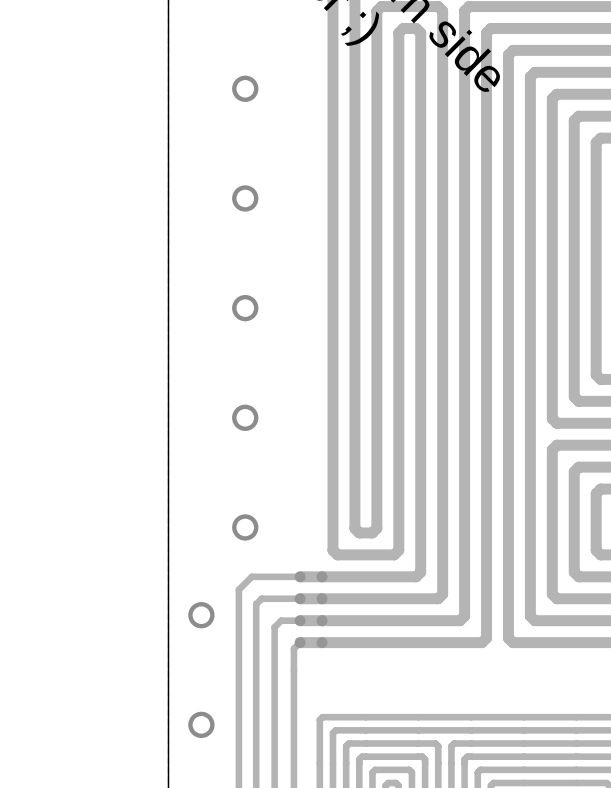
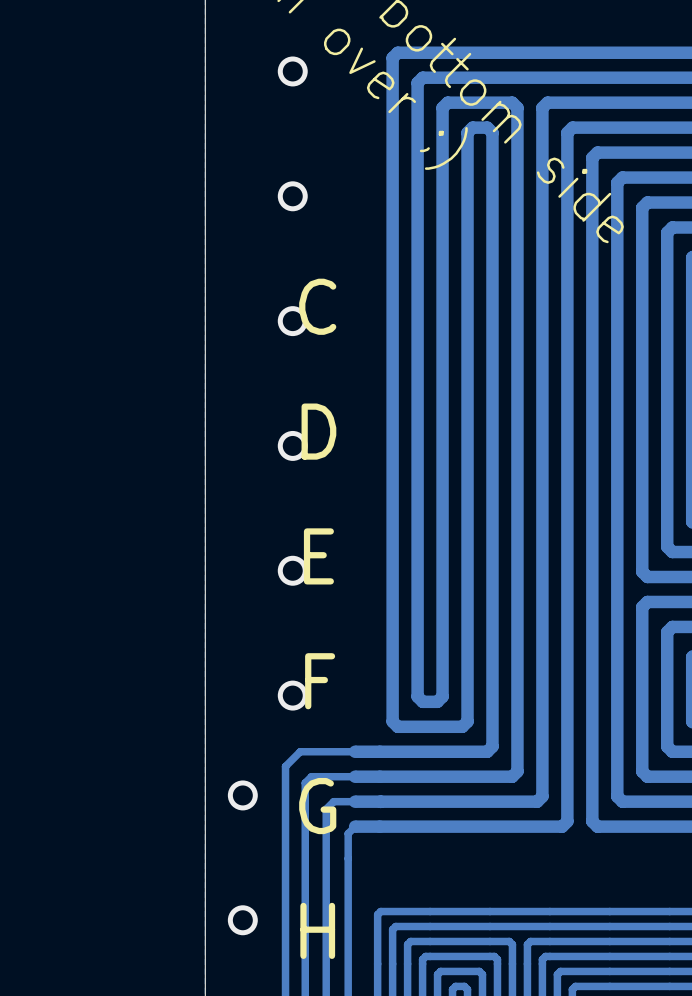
text: none -> C (317, 306)
text: none -> D (318, 431)
text: none -> E (318, 556)
text: none -> F (320, 681)
text: none -> G (317, 806)
text: none -> H (317, 930)

